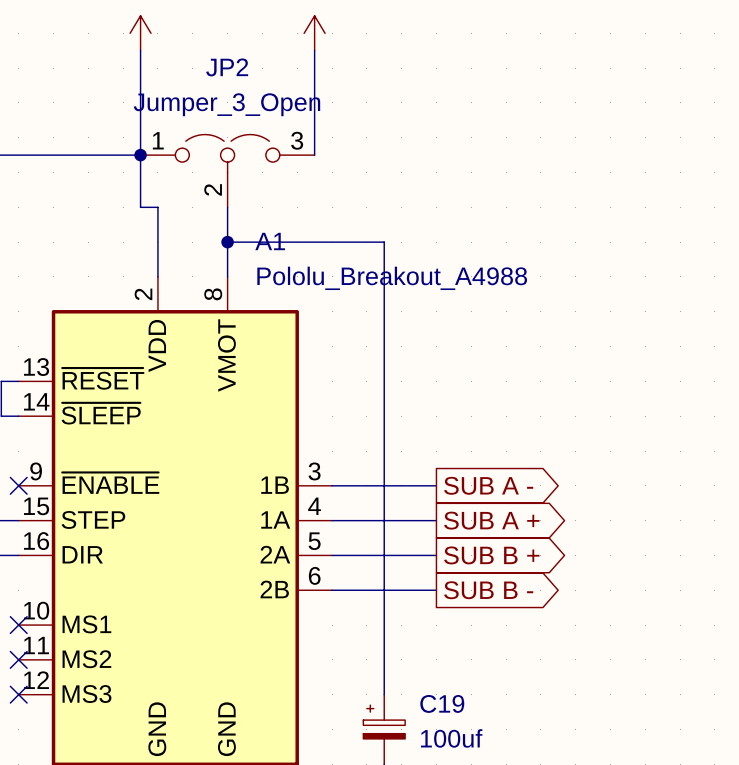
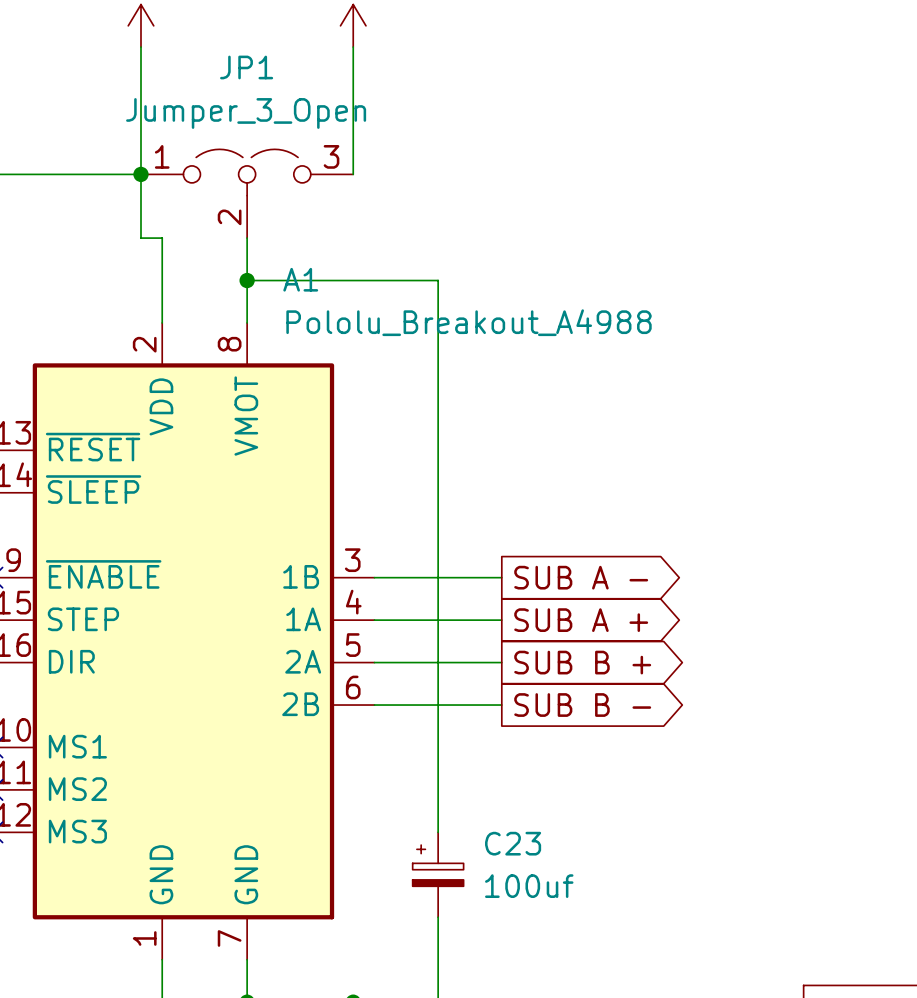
JP2 name: JP2 (227, 67) -> JP1 (246, 67)
C19 name: C19 (442, 703) -> C23 (513, 843)

